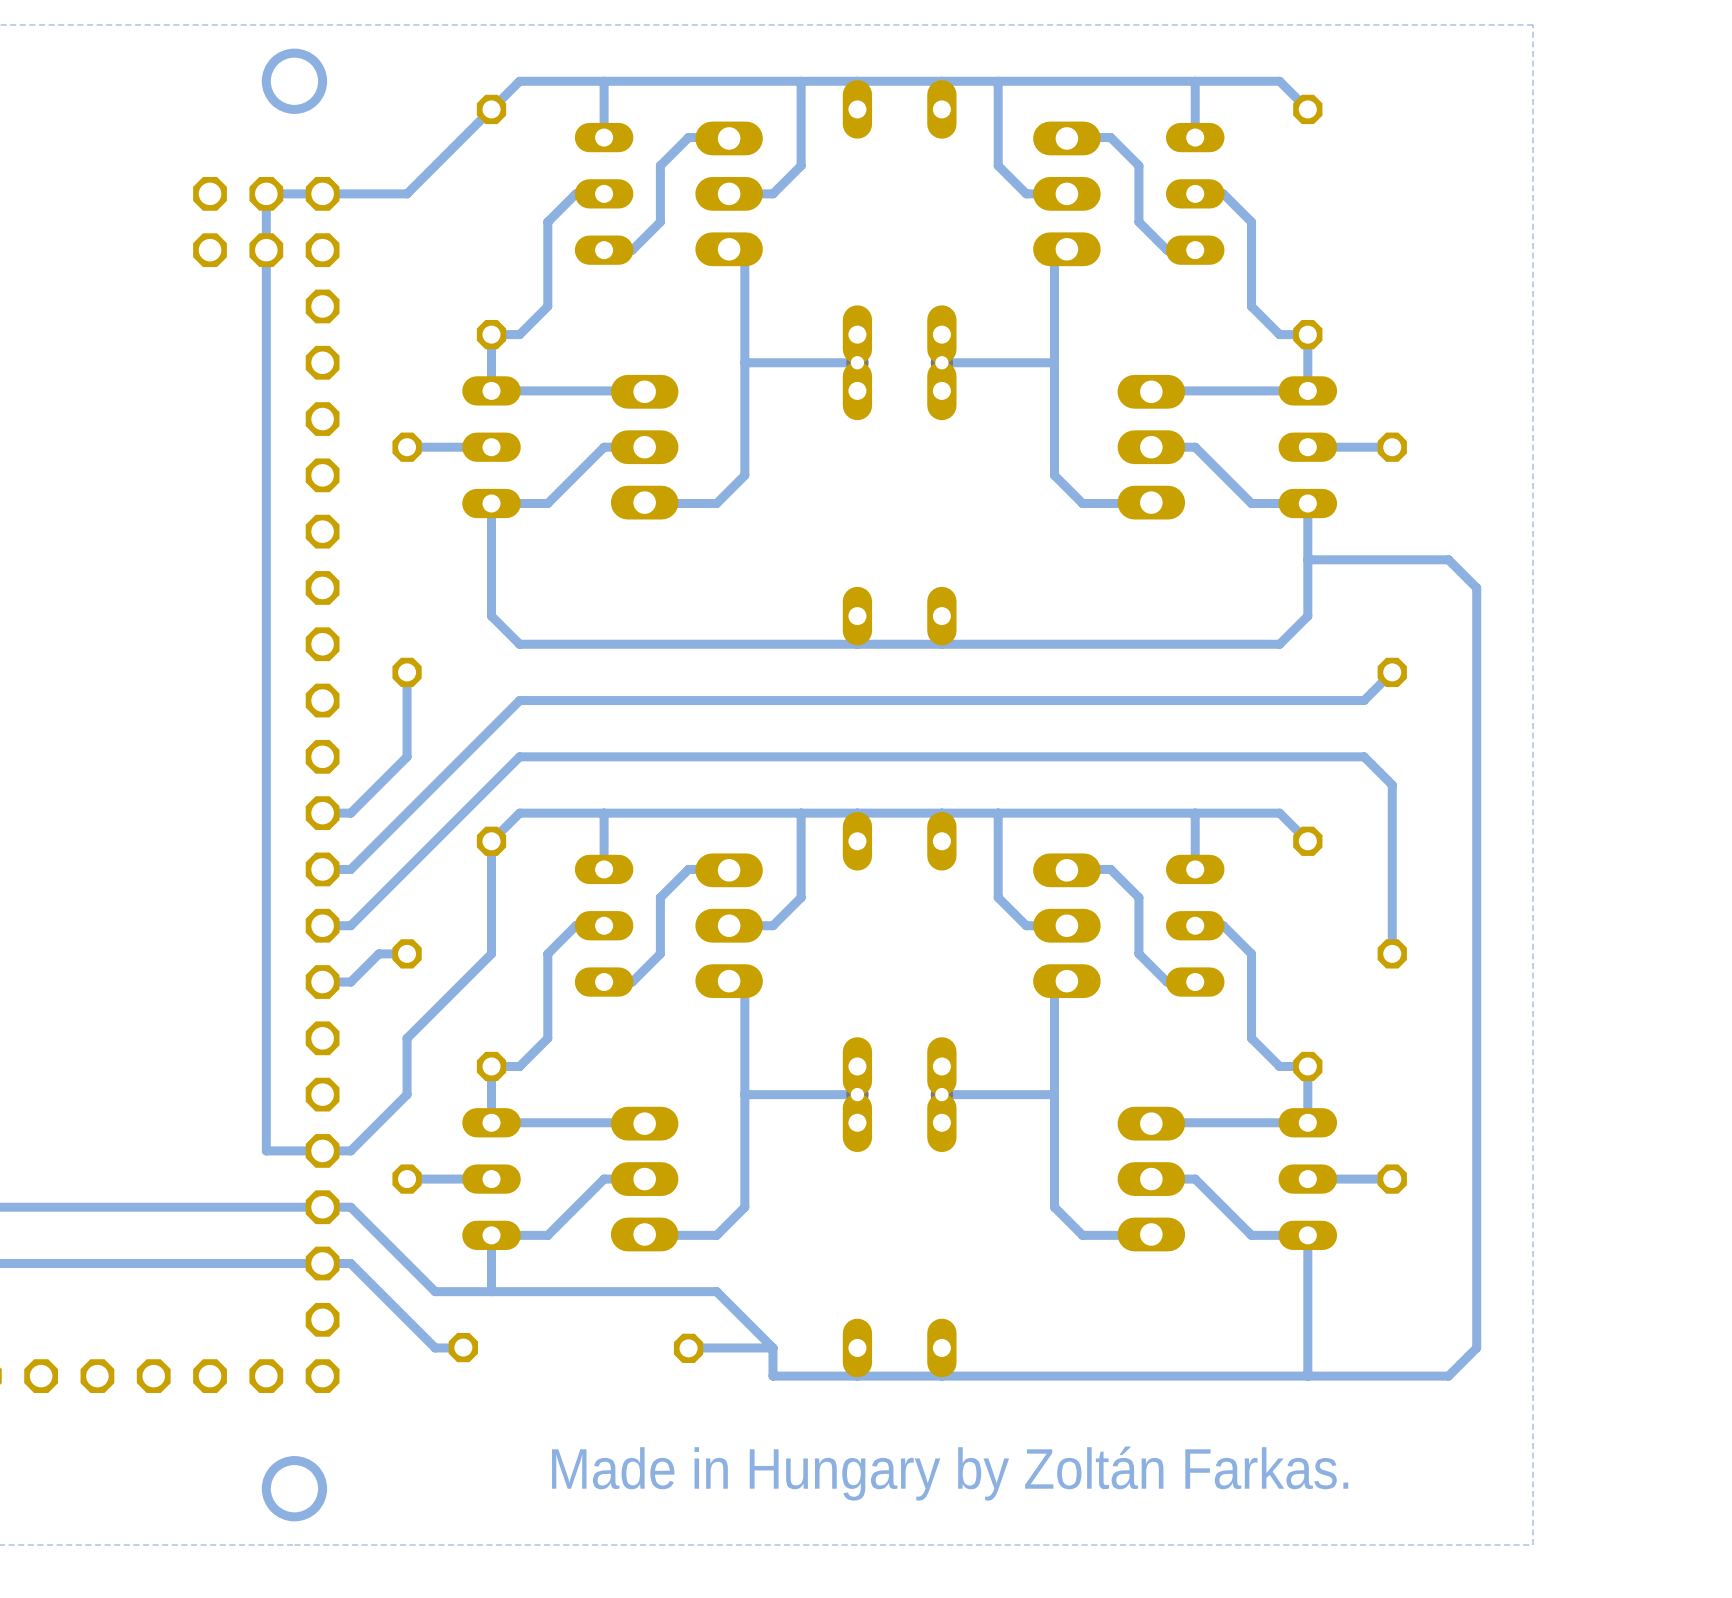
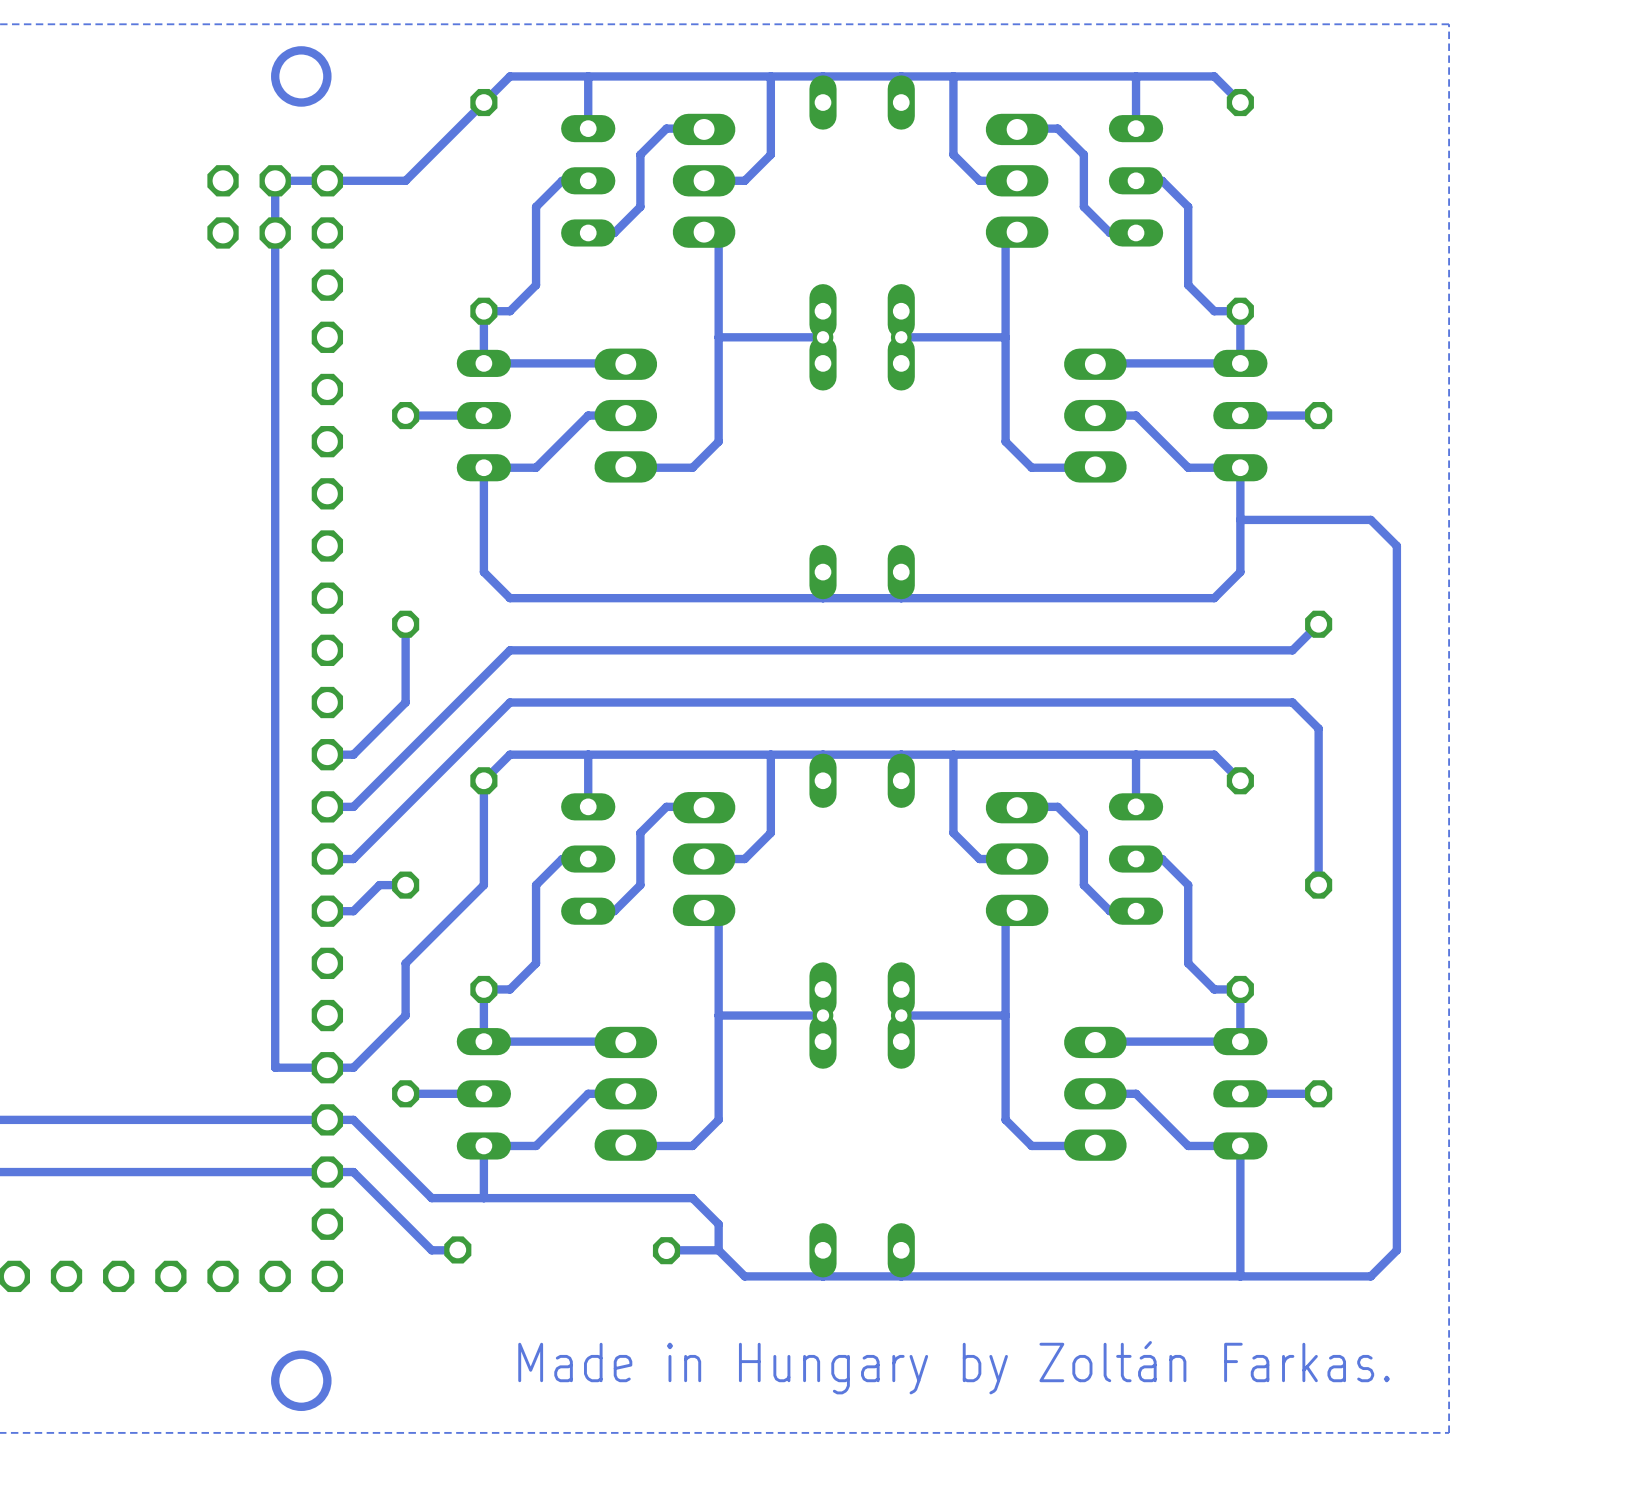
bottom track: (744, 1319) (772, 1347) -> (718, 1224) (718, 1250) (744, 1276)
bottom track: (772, 1347) (772, 1376) -> none
bottom track: (772, 1347) (744, 1347) -> none
text position: Made in Hungary by Zoltán Farkas. (950, 1473) -> Made in Hungary by Zoltán Farkas. (954, 1367)

